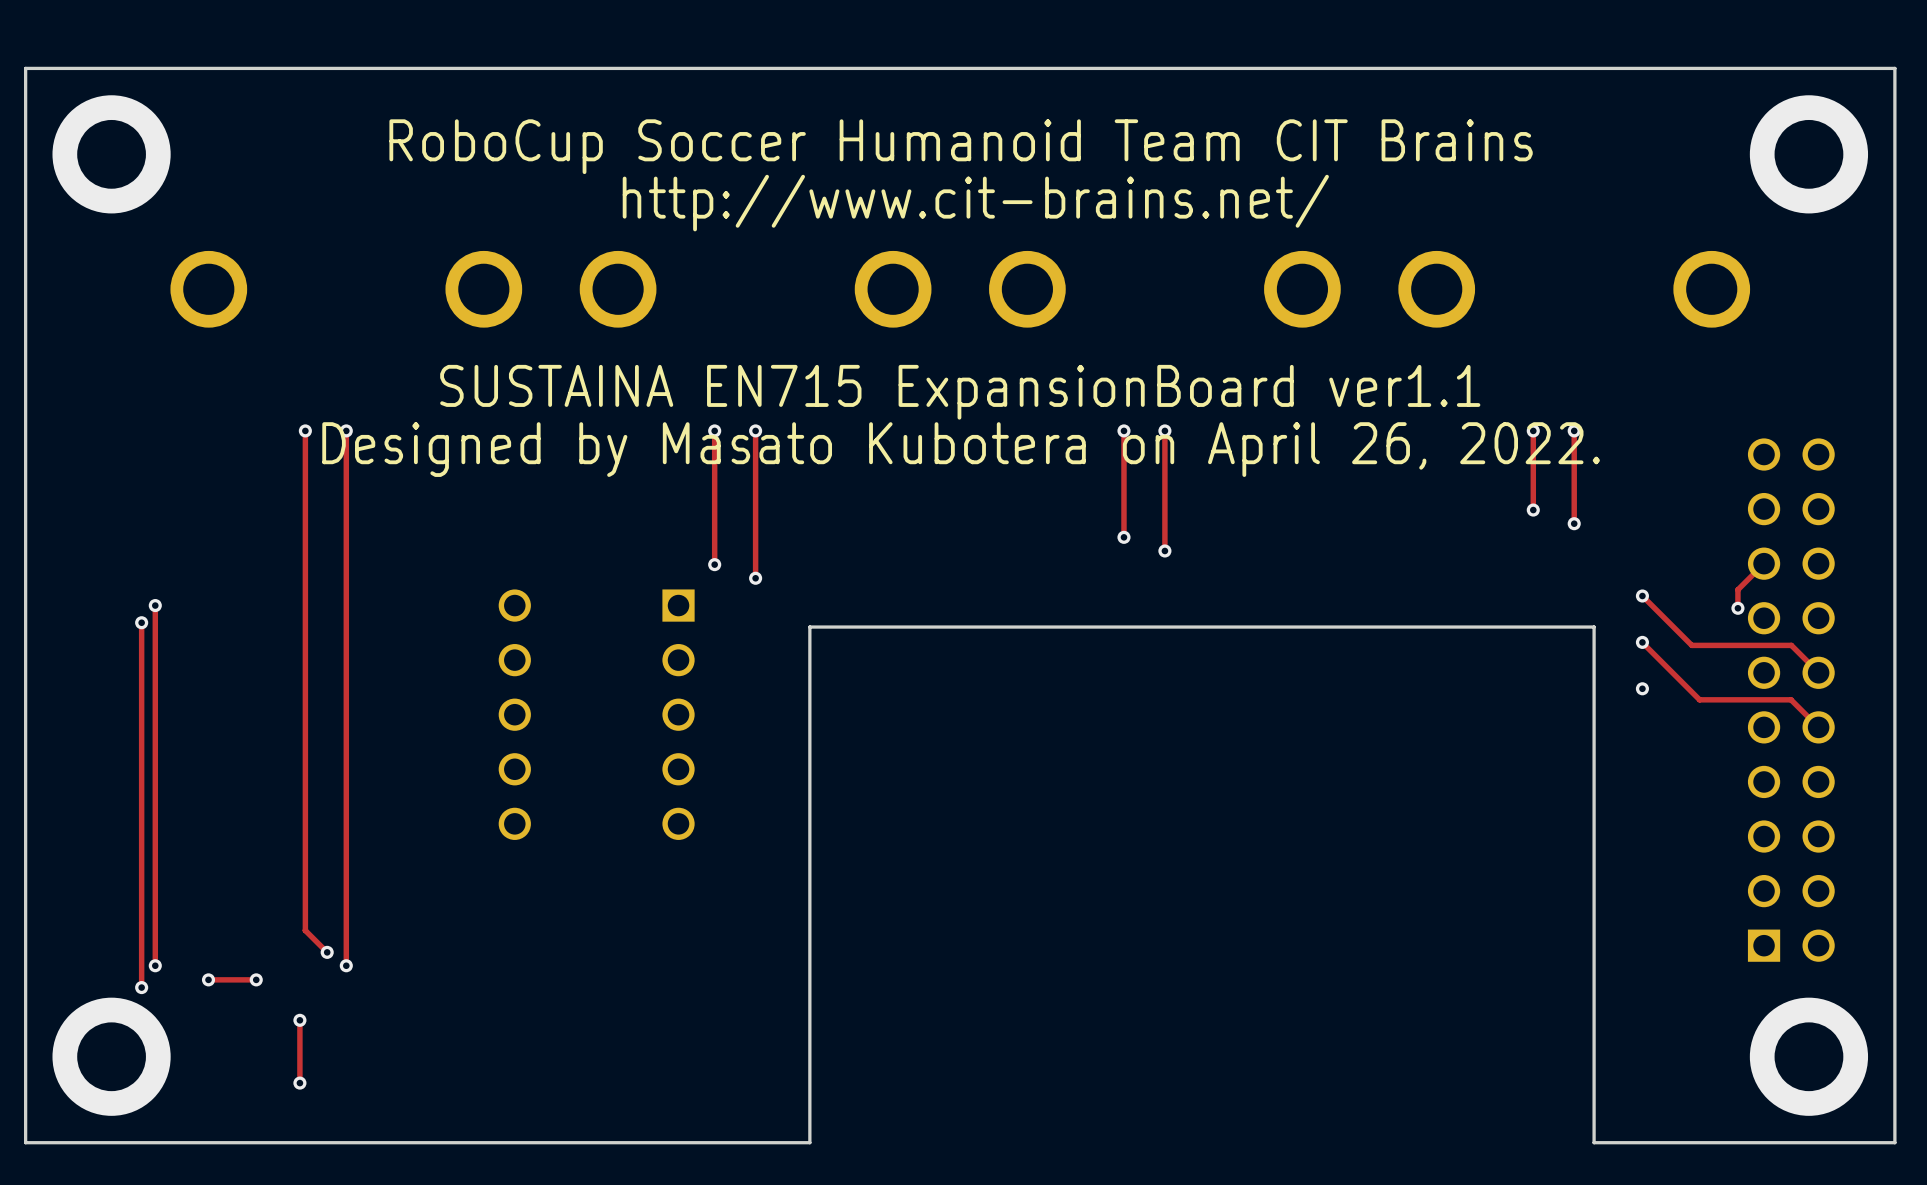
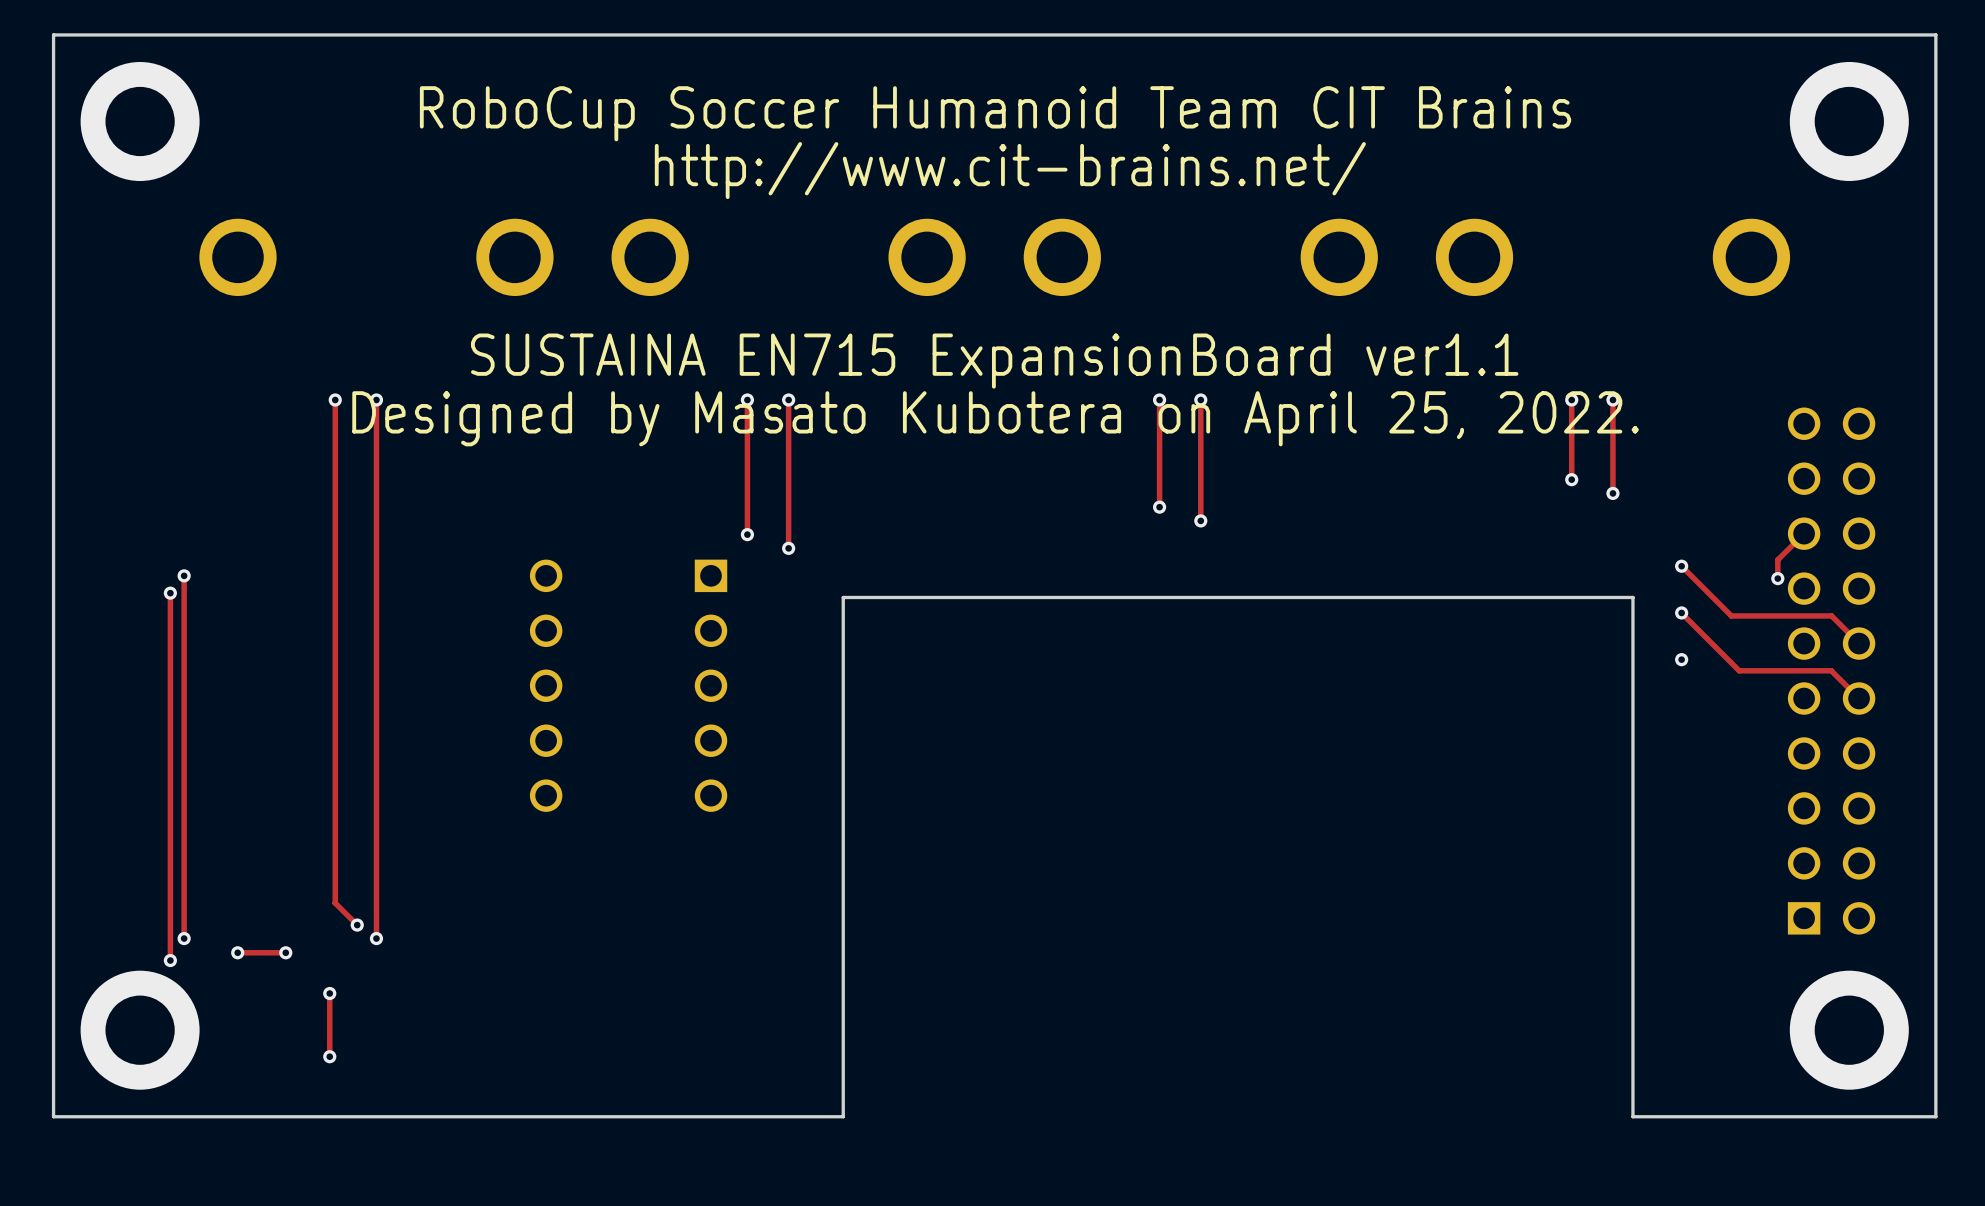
text: Designed by Masato Kubotera on April 26, 2022. (961, 449) -> Designed by Masato Kubotera on April 25, 2022. (995, 418)

